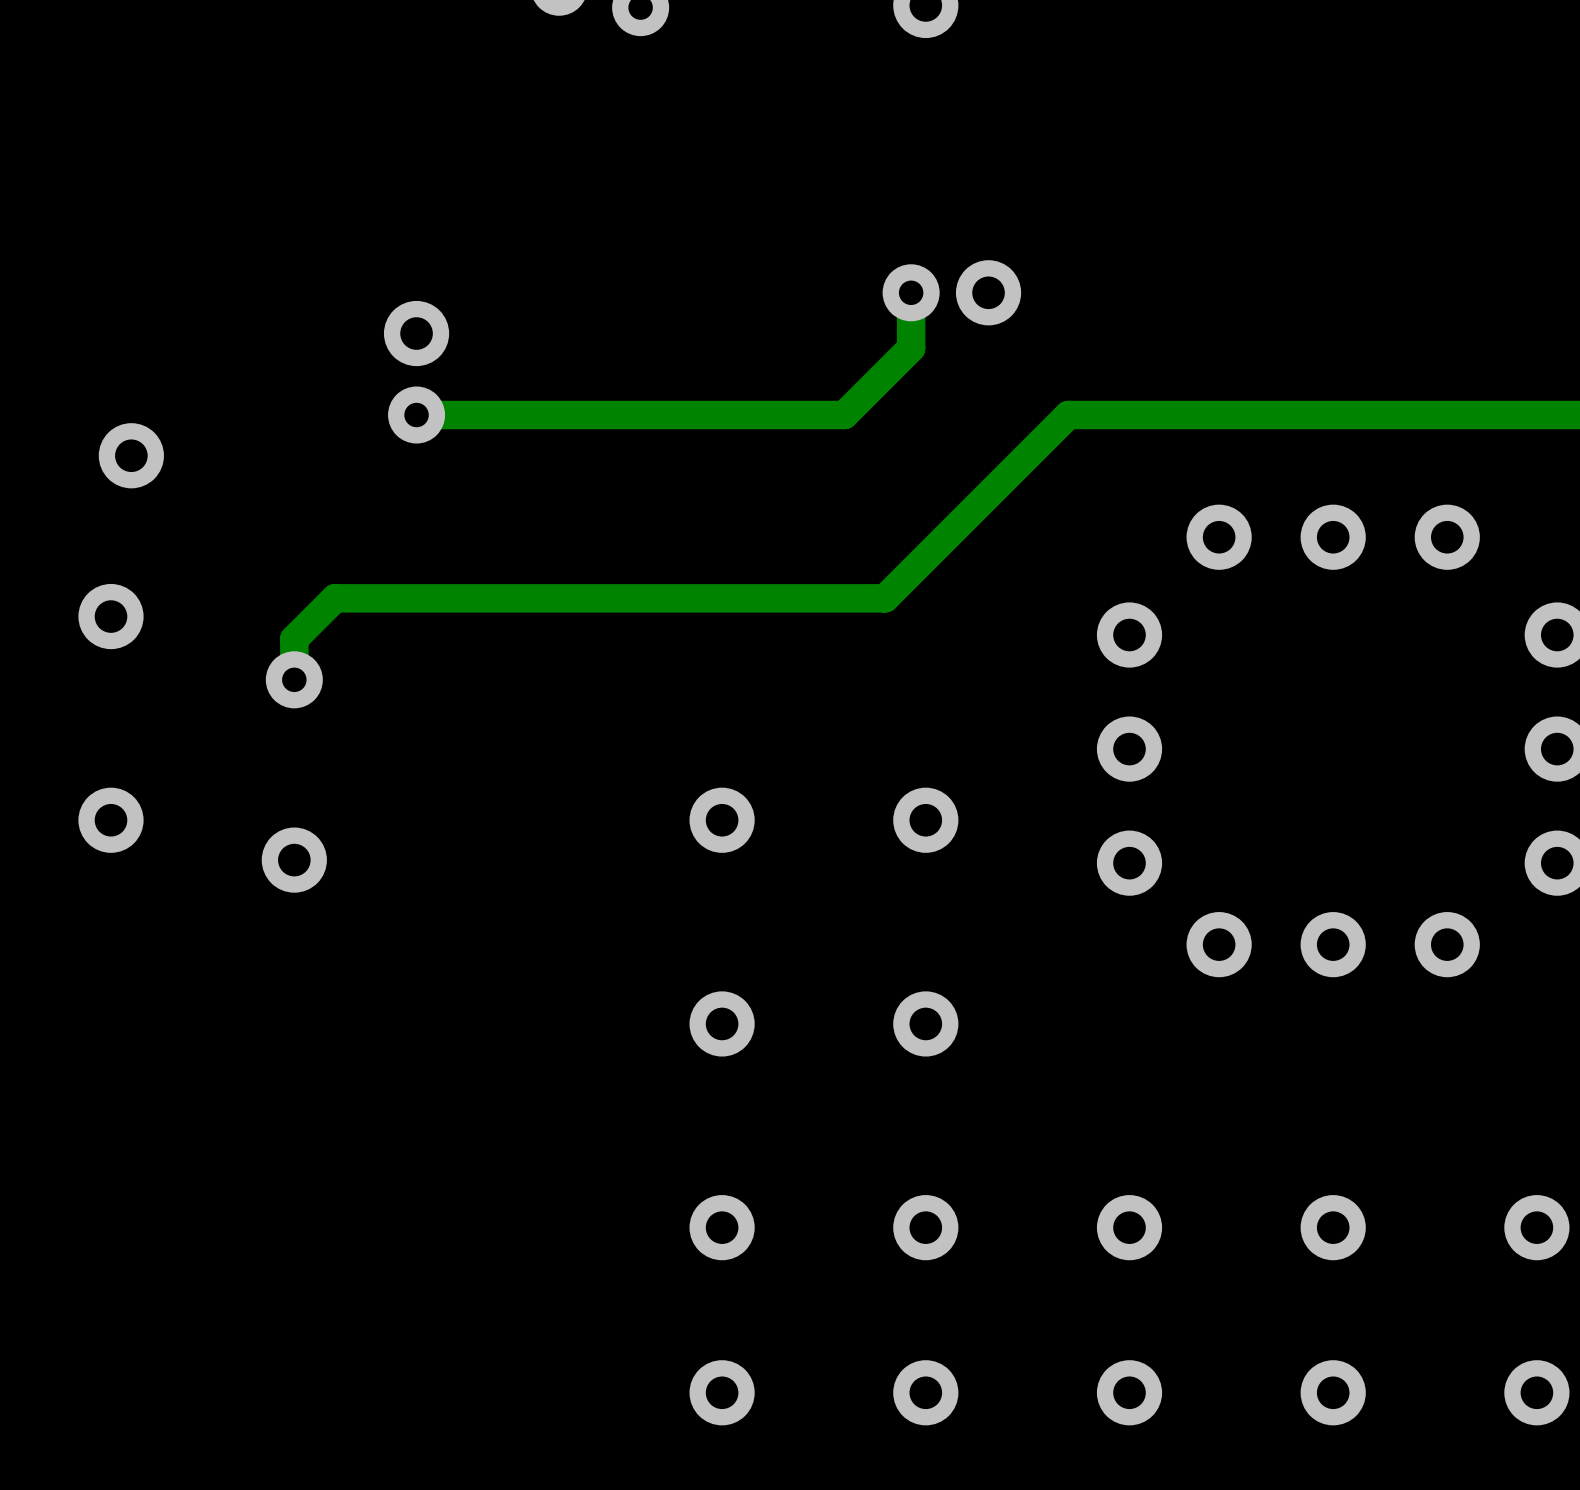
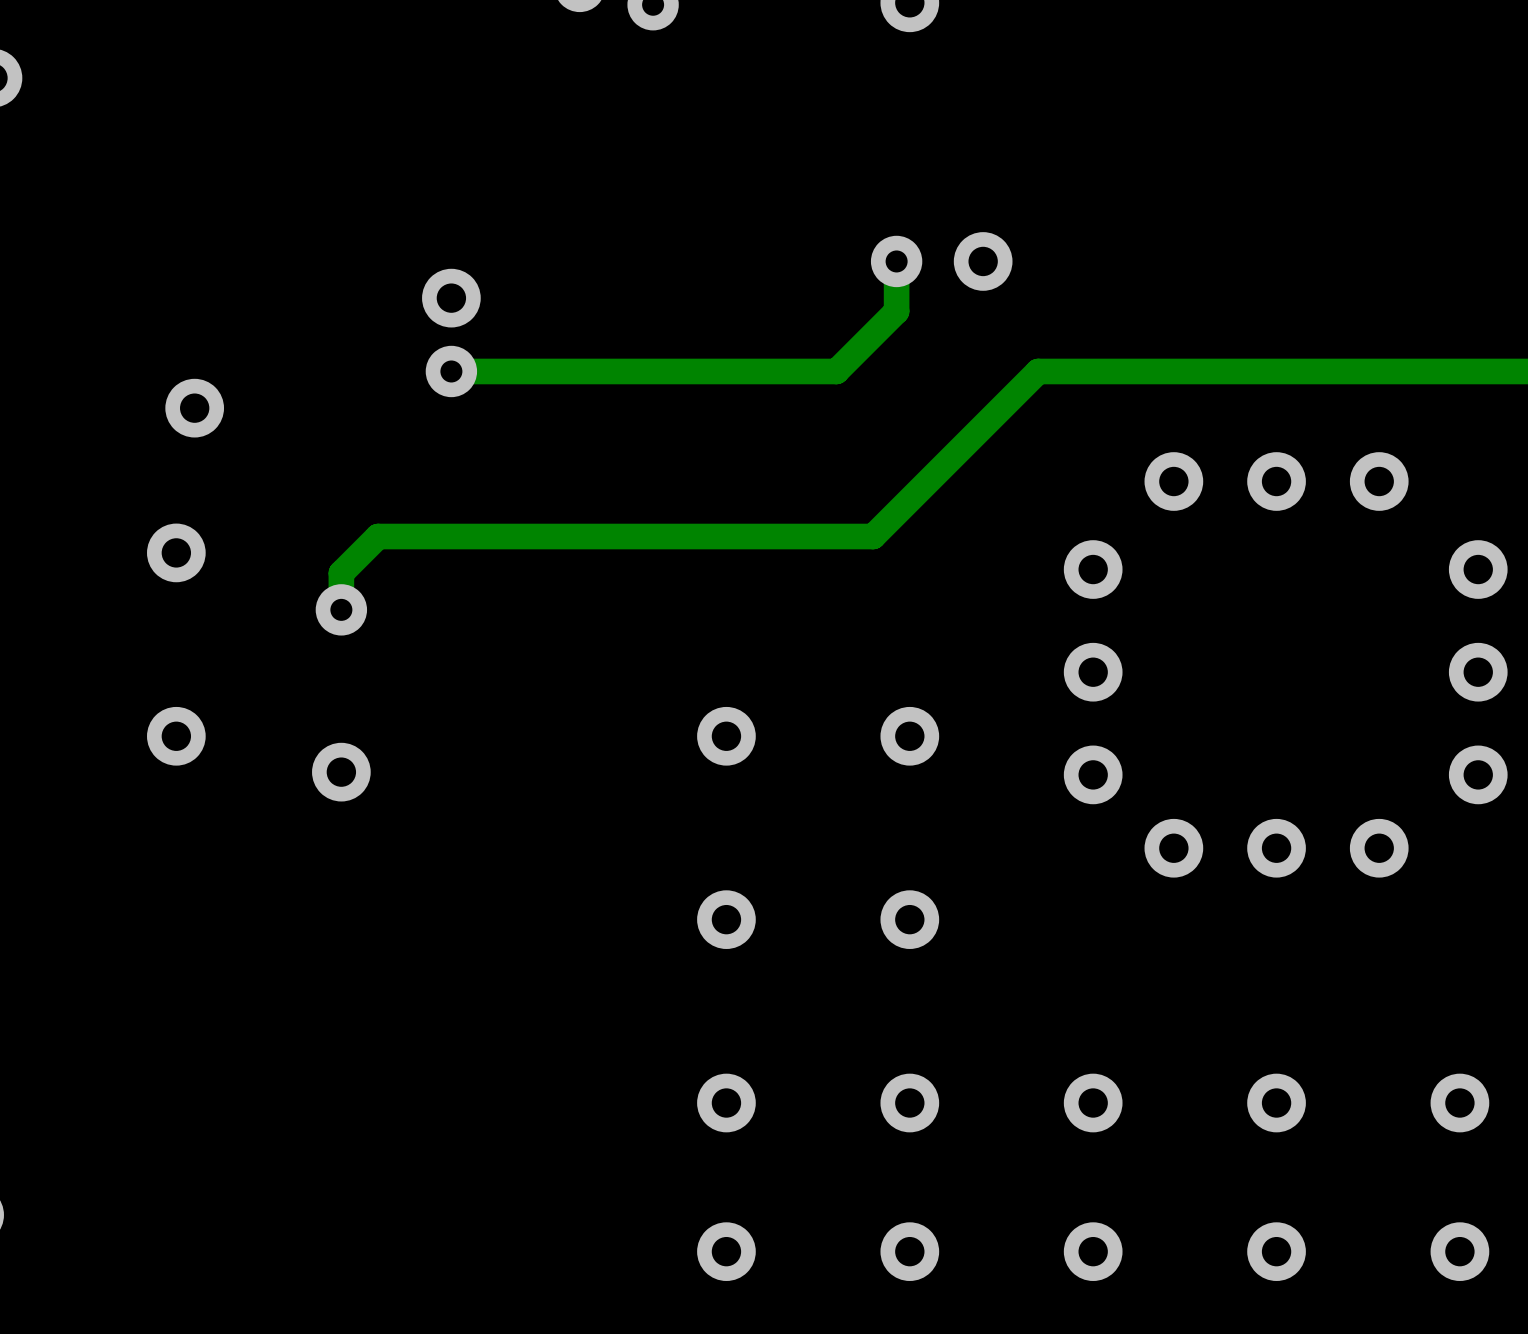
via position: (988, 292) -> (983, 261)

